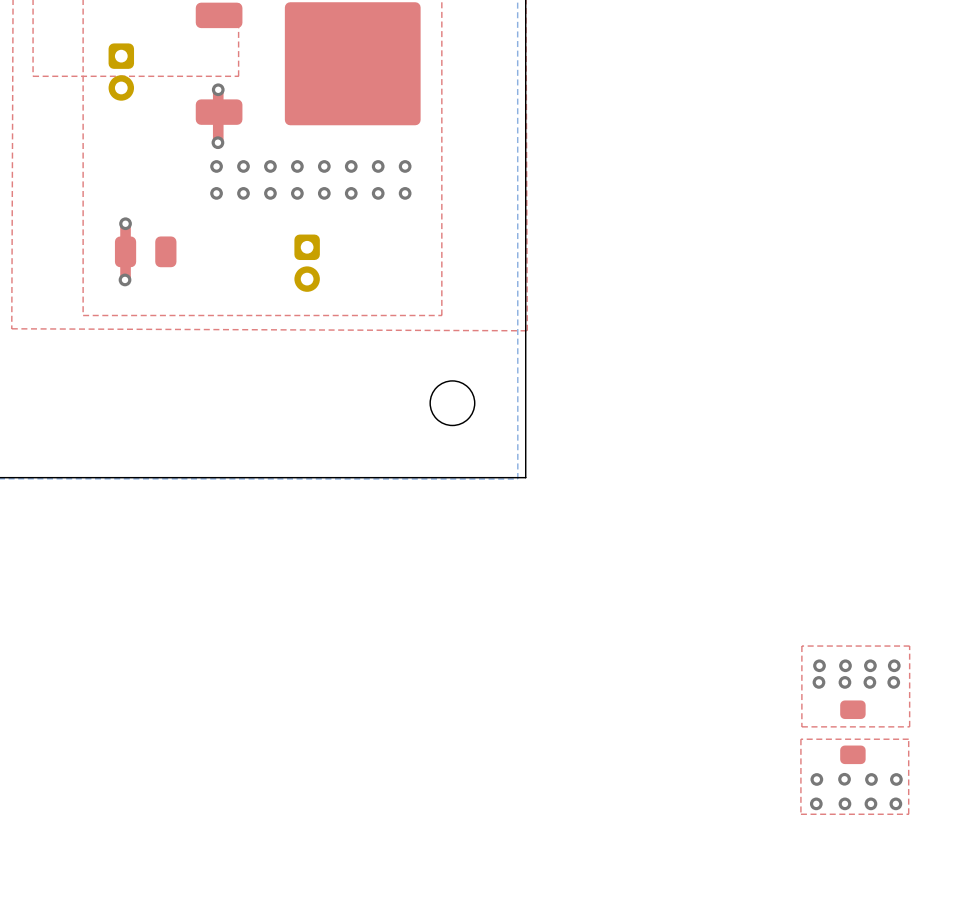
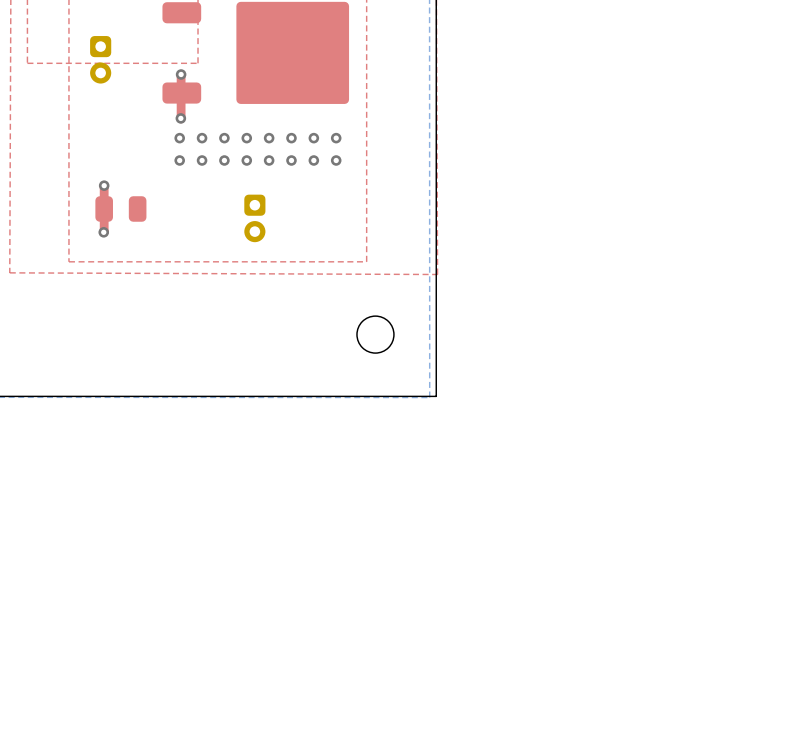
top zone outline: (909, 646) (909, 726) (801, 726) (801, 646) (909, 646) -> none
via: (819, 665) -> none
via: (845, 665) -> none
via: (870, 665) -> none
via: (894, 665) -> none
via: (818, 682) -> none
via: (844, 682) -> none
via: (869, 682) -> none
via: (893, 682) -> none
part: (852, 732) -> none
top zone outline: (908, 739) (908, 814) (800, 814) (800, 739) (908, 739) -> none
via: (816, 779) -> none
via: (844, 779) -> none
via: (871, 779) -> none
via: (896, 779) -> none
via: (816, 803) -> none
via: (844, 803) -> none
via: (870, 803) -> none
via: (895, 803) -> none

